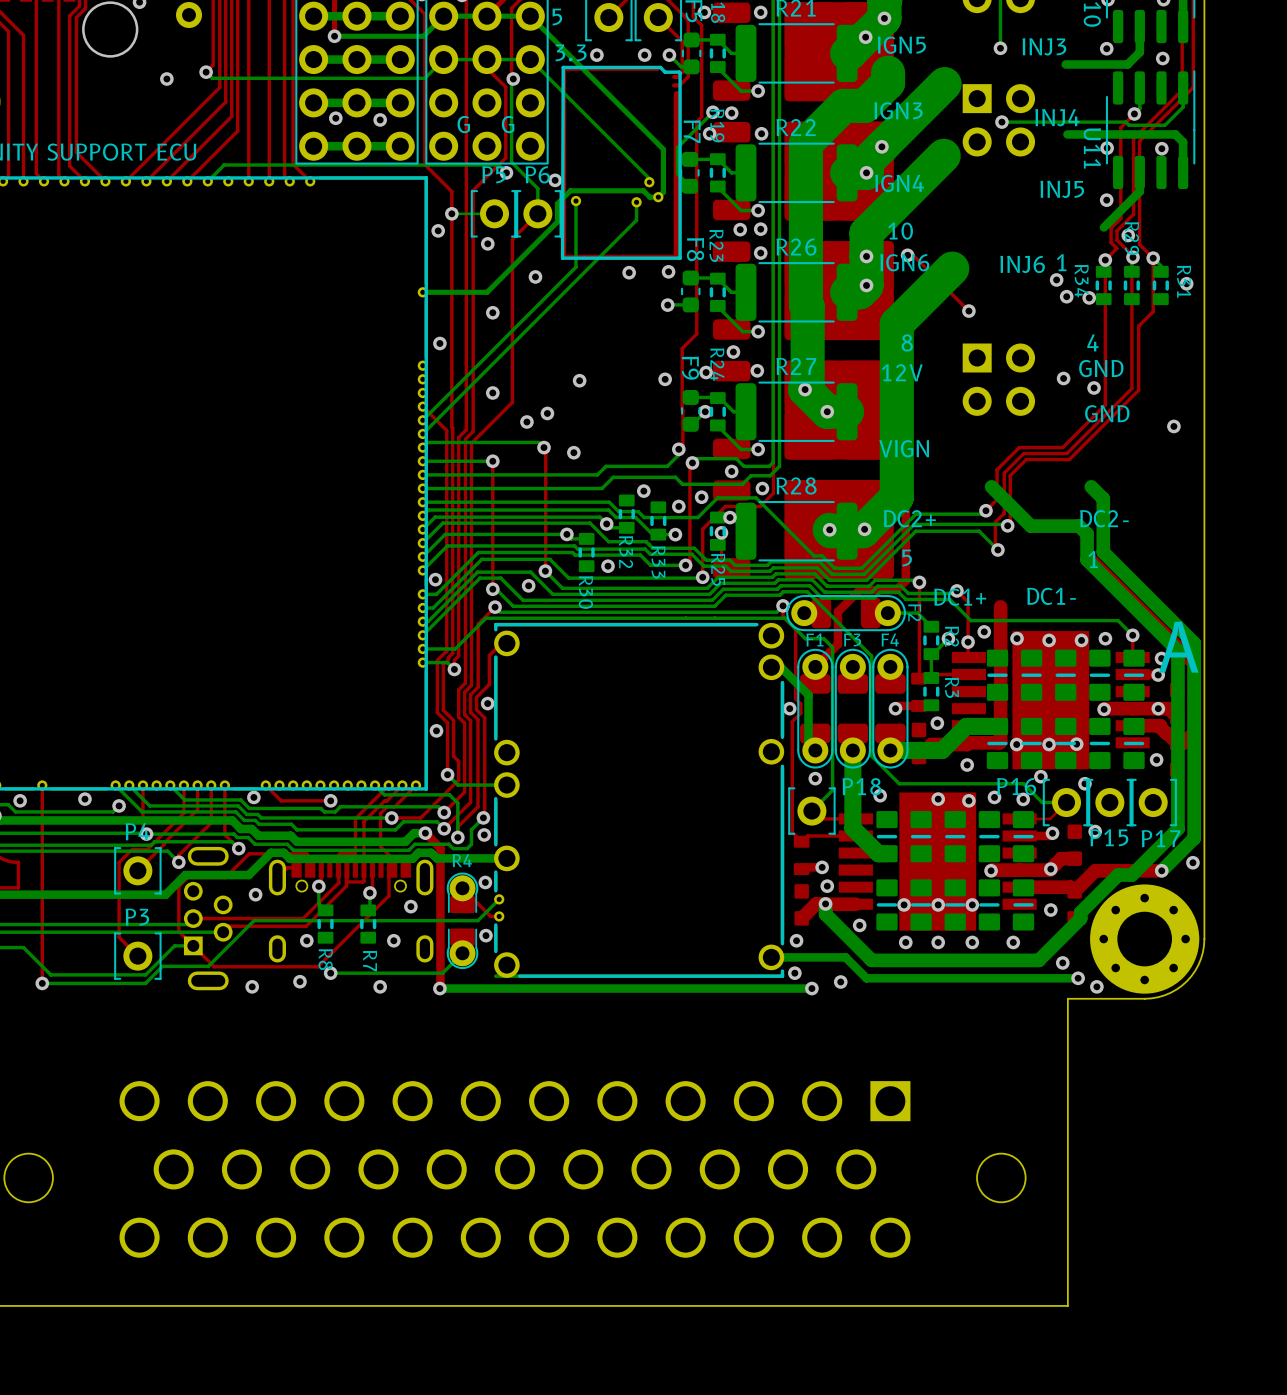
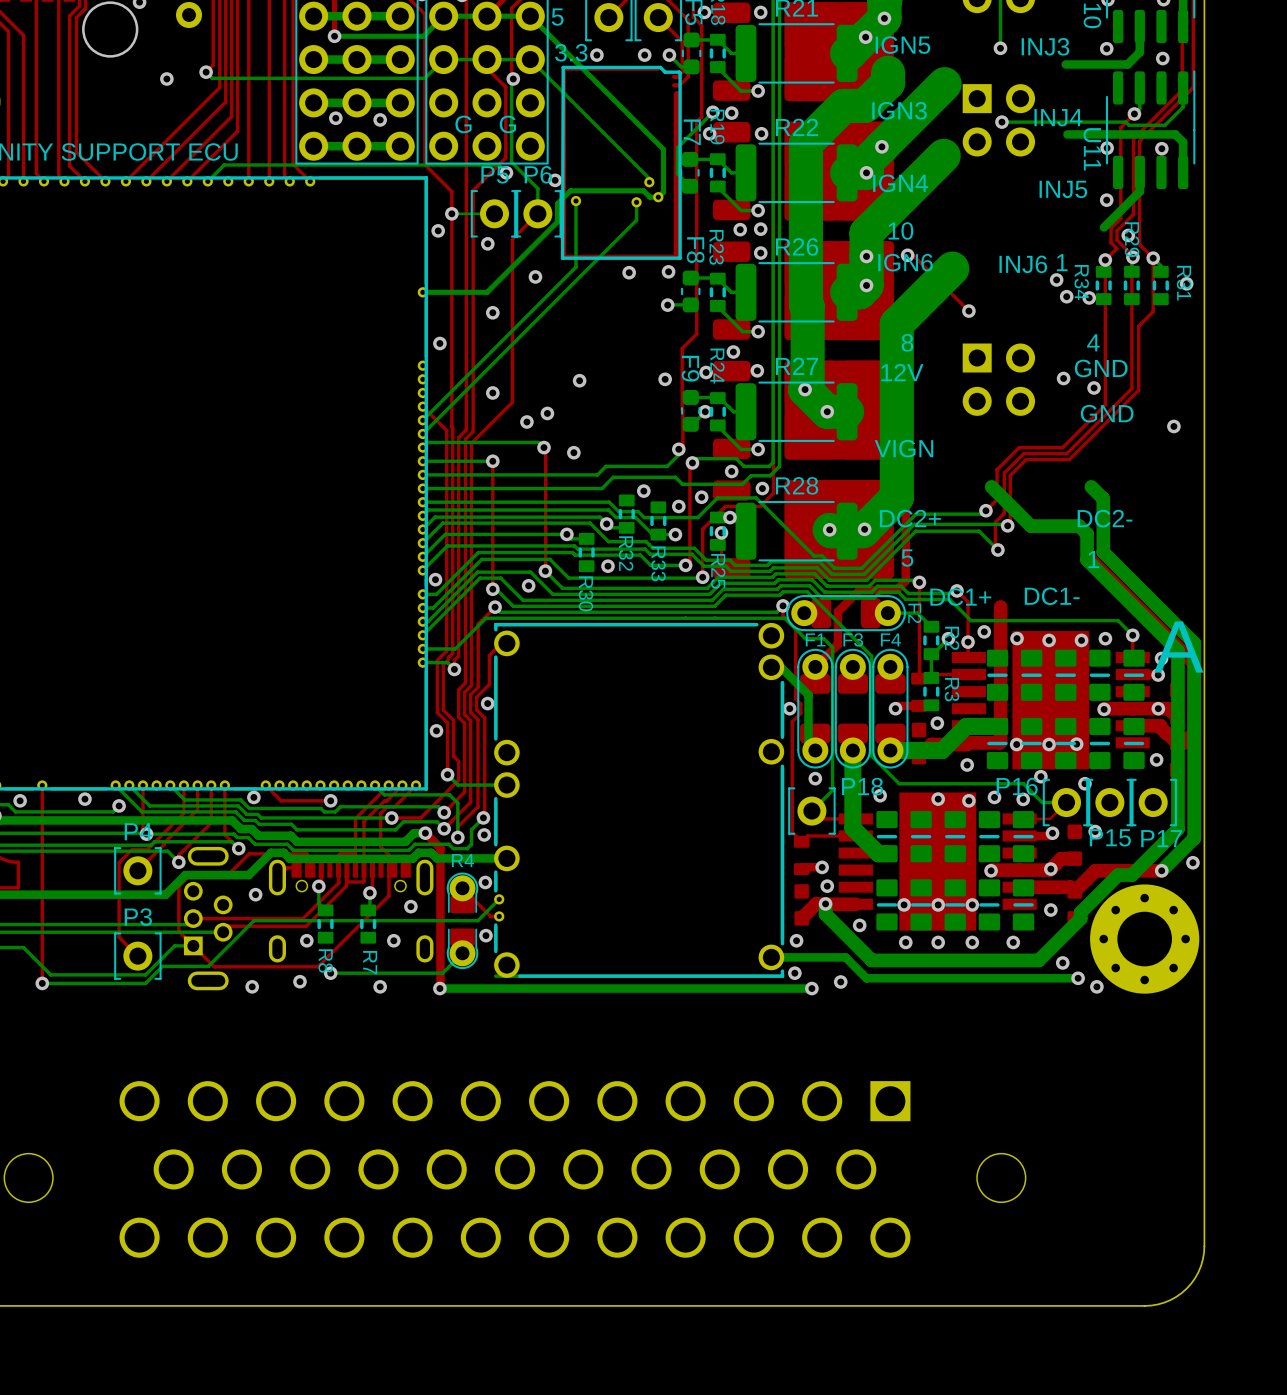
board edge: (1204, 939) (1202, 952) (1195, 970) (1186, 981) (1170, 992) (1151, 998) (1067, 998) (1067, 1305) -> (1204, 939) (1204, 1246) (1201, 1265) (1186, 1288) (1164, 1302) (1144, 1305) (1067, 1305)

